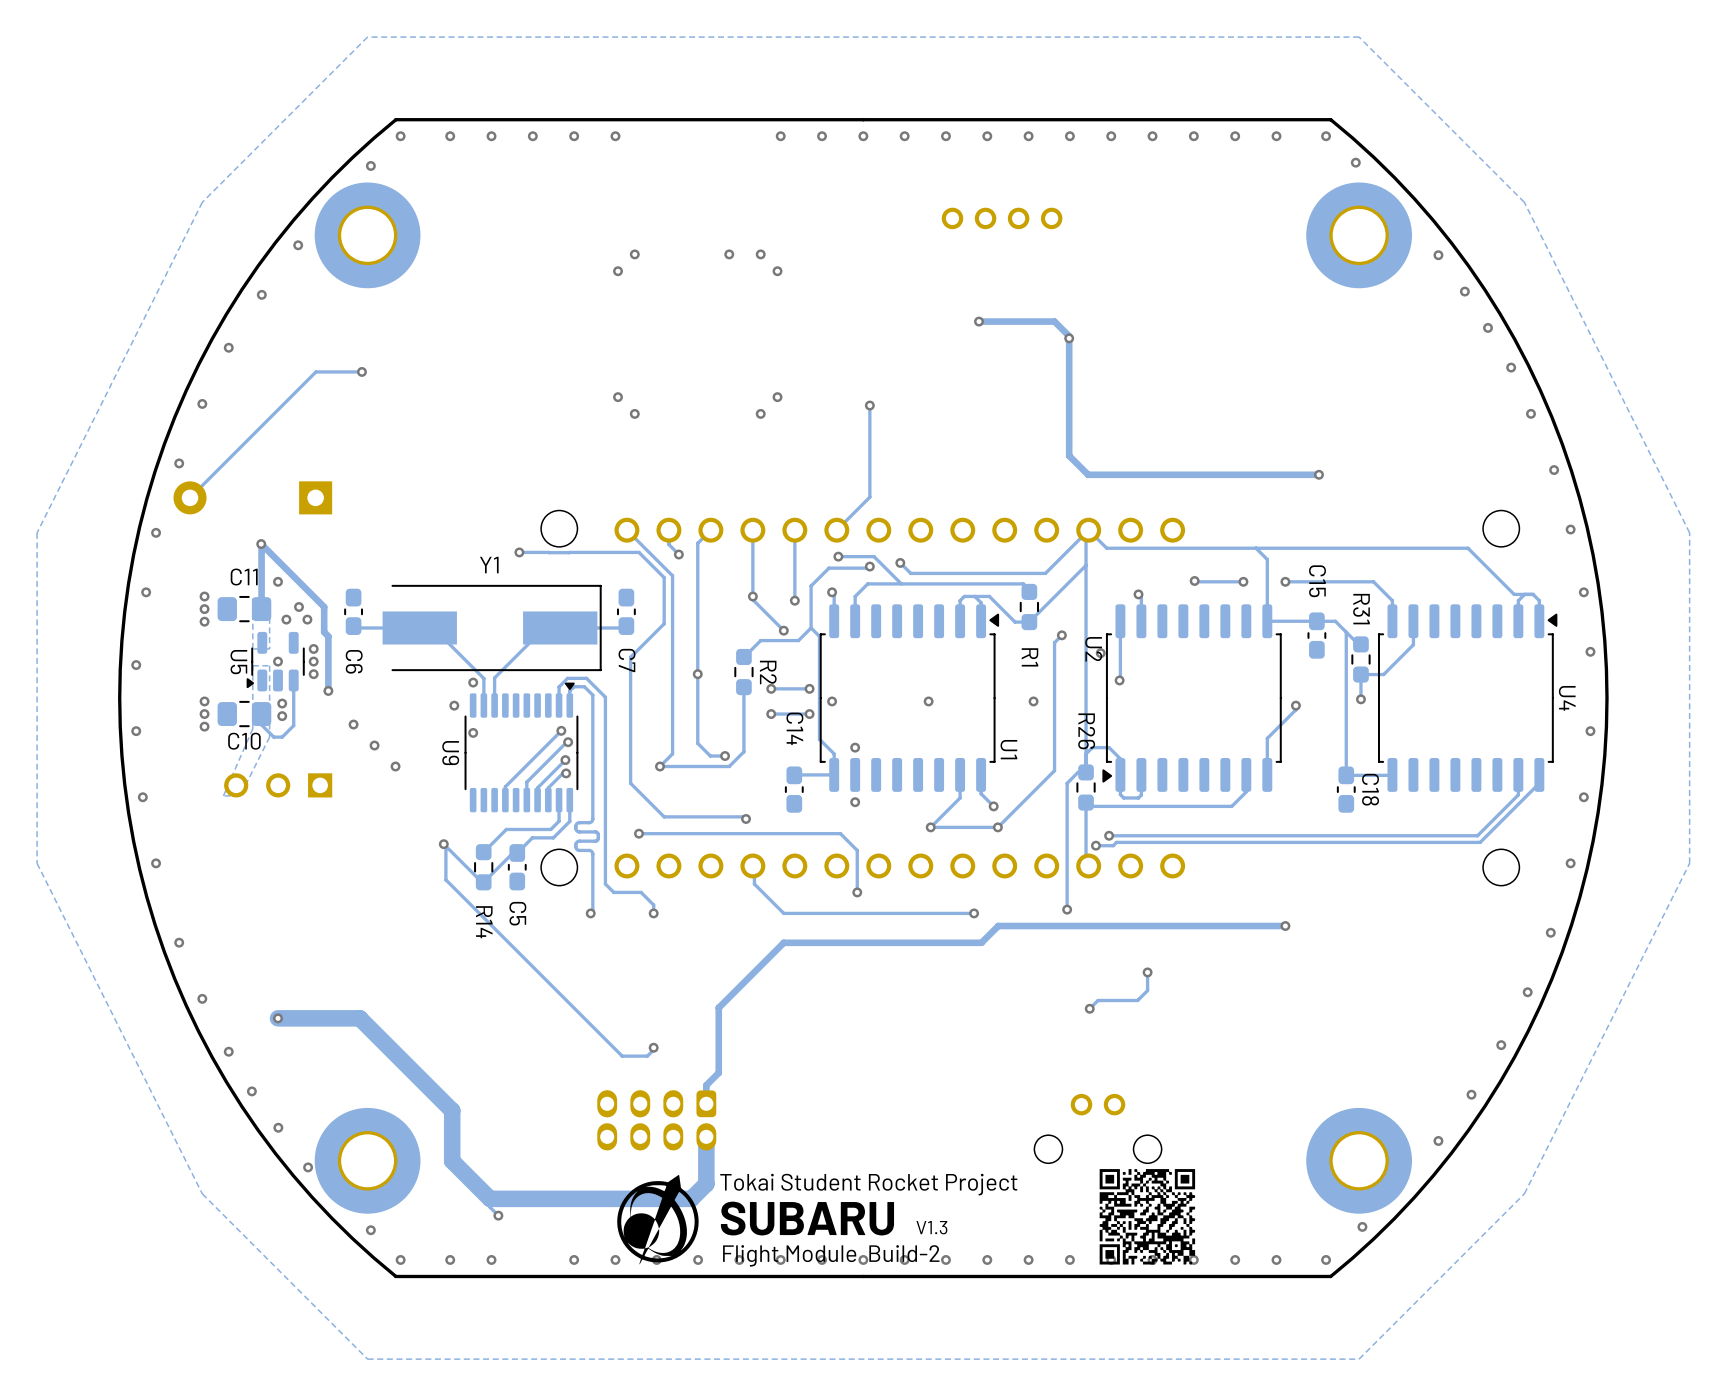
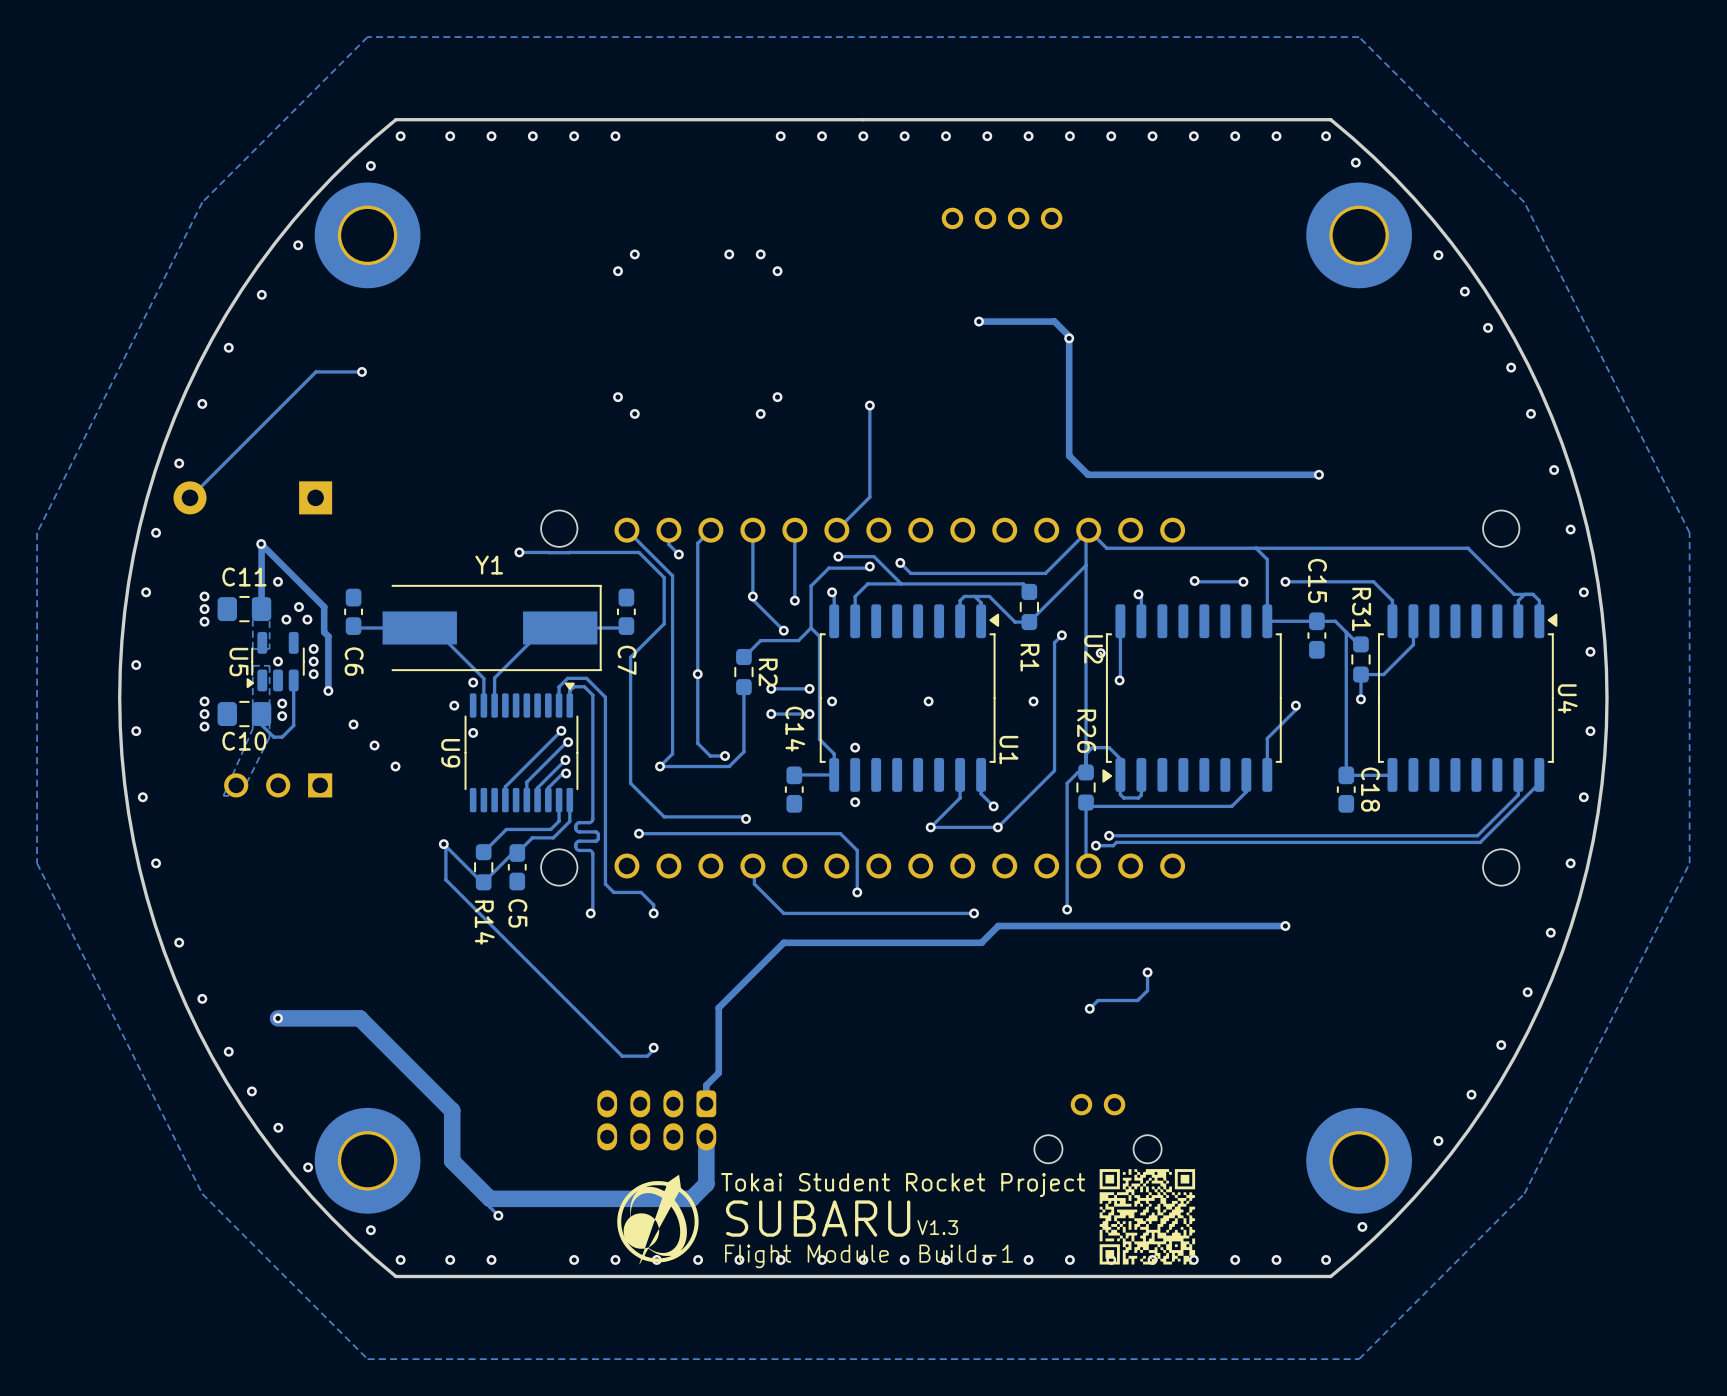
text: Flight Module Build-2 (831, 1255) -> Flight Module Build-1 (869, 1256)

